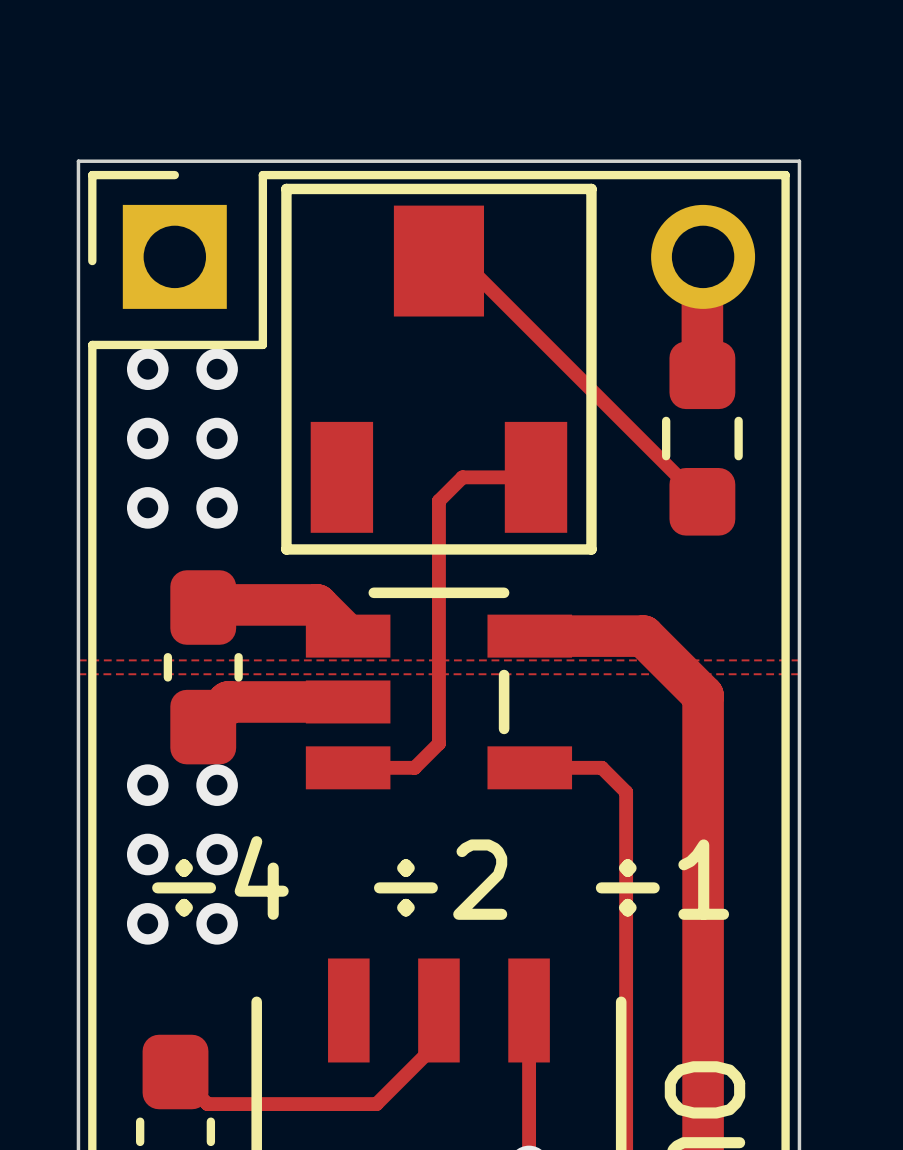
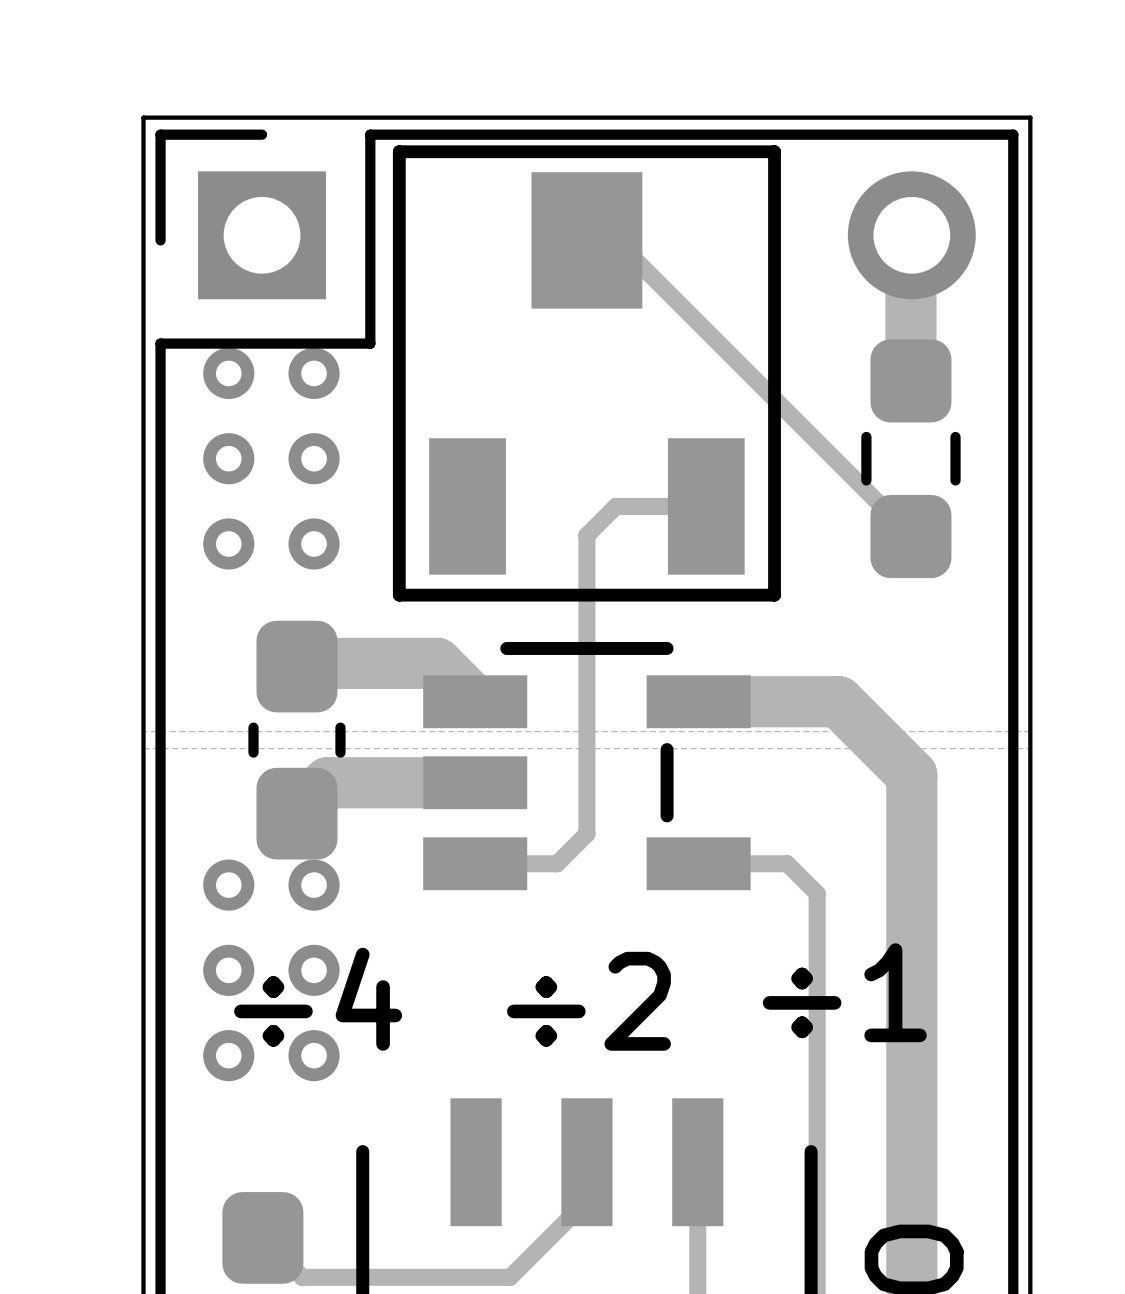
text position: ÷1 (662, 879) -> ÷1 (844, 992)

